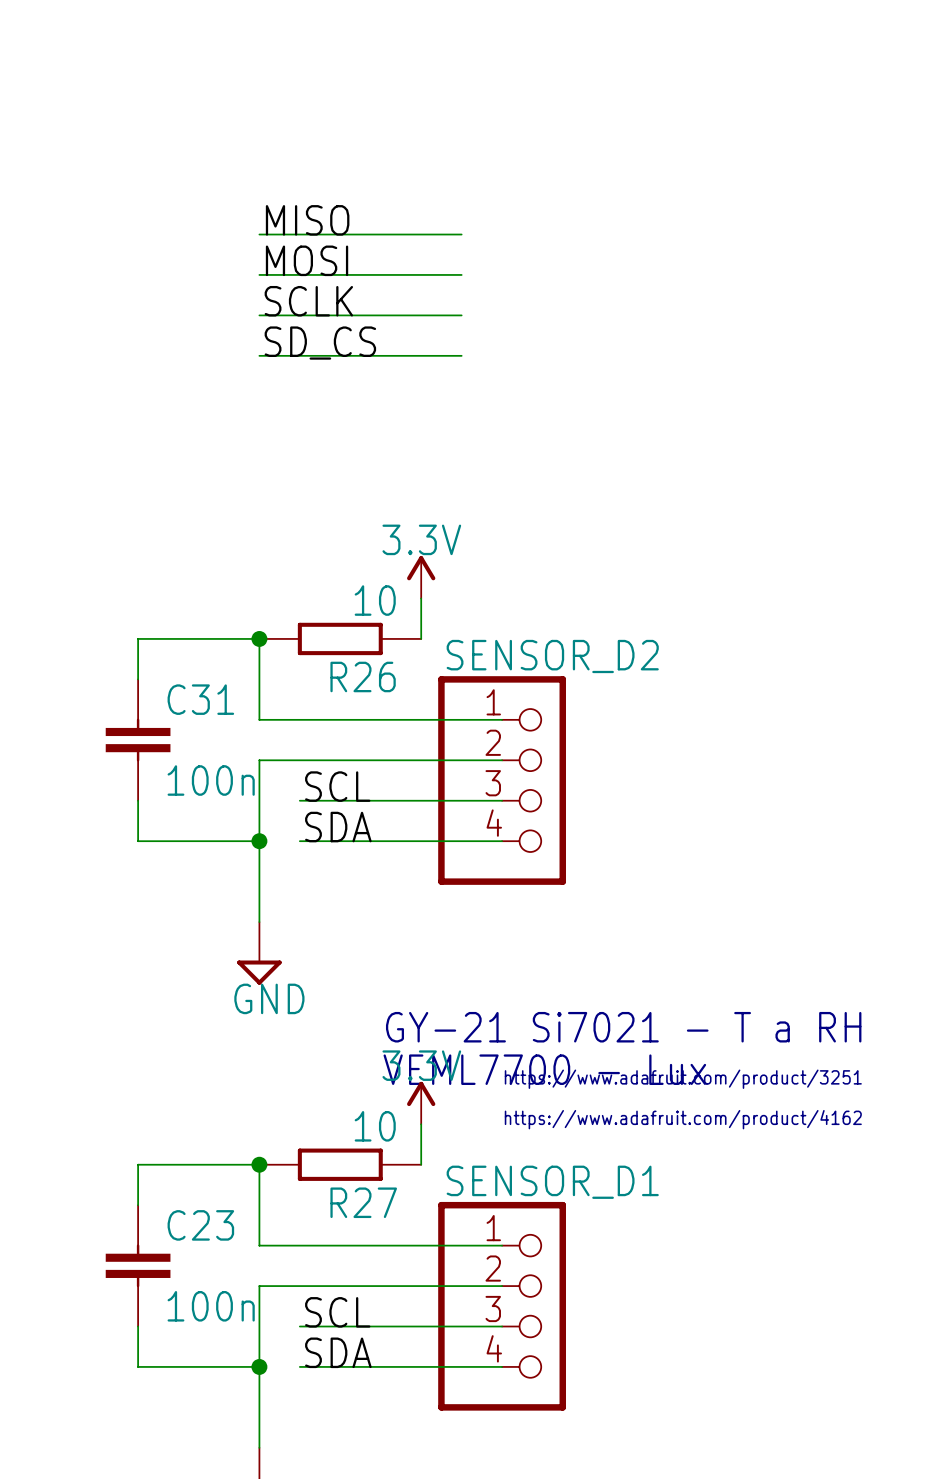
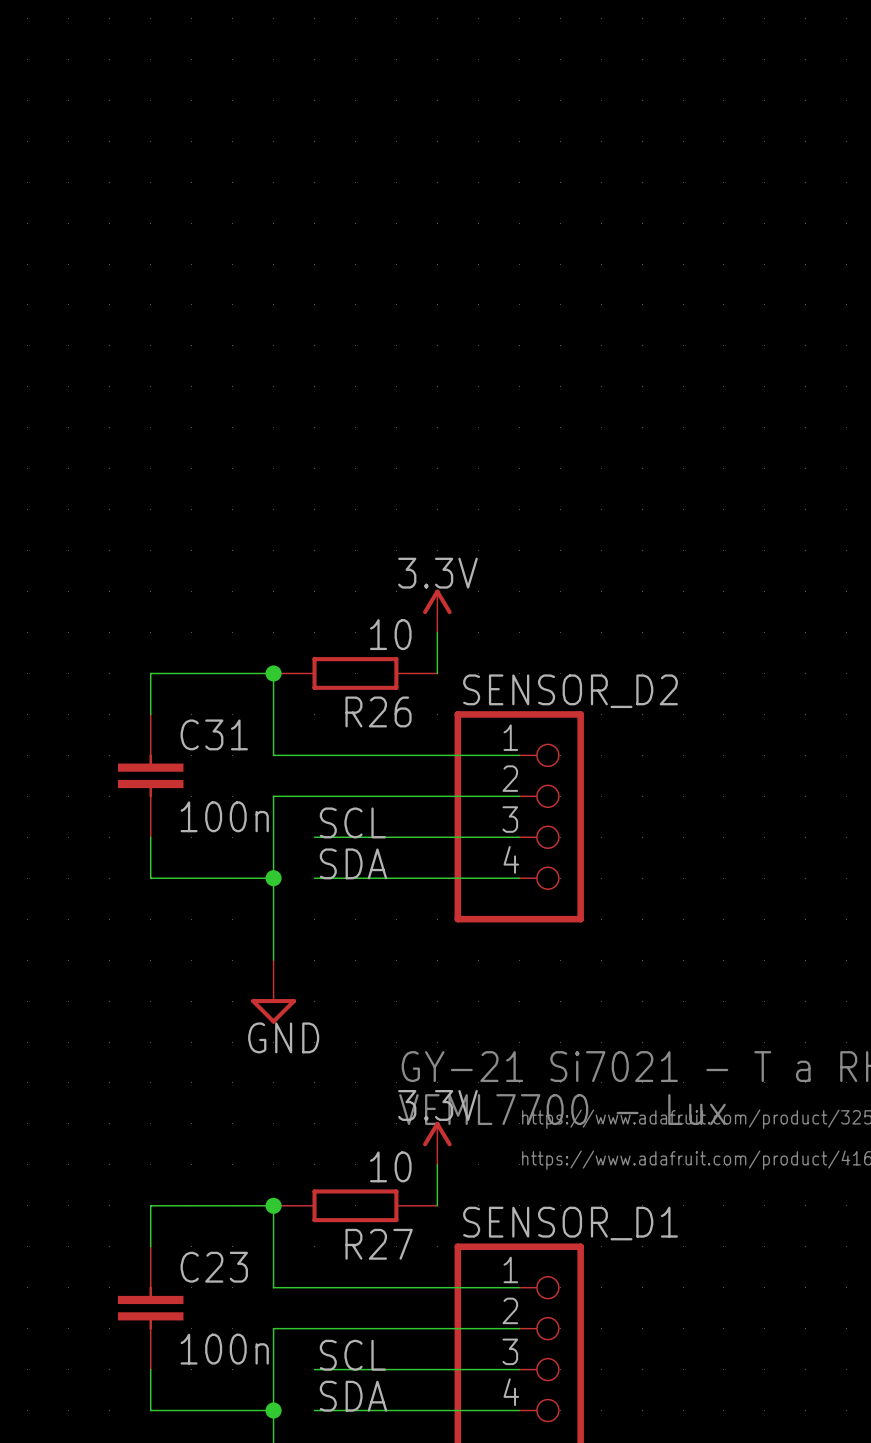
label: MISO (307, 220) -> none
wire: (259, 234) (461, 234) -> none
label: MOSI (307, 260) -> none
wire: (259, 274) (461, 274) -> none
label: SCLK (308, 301) -> none
wire: (259, 315) (461, 315) -> none
label: SD_CS (320, 343) -> none
wire: (259, 355) (461, 355) -> none

